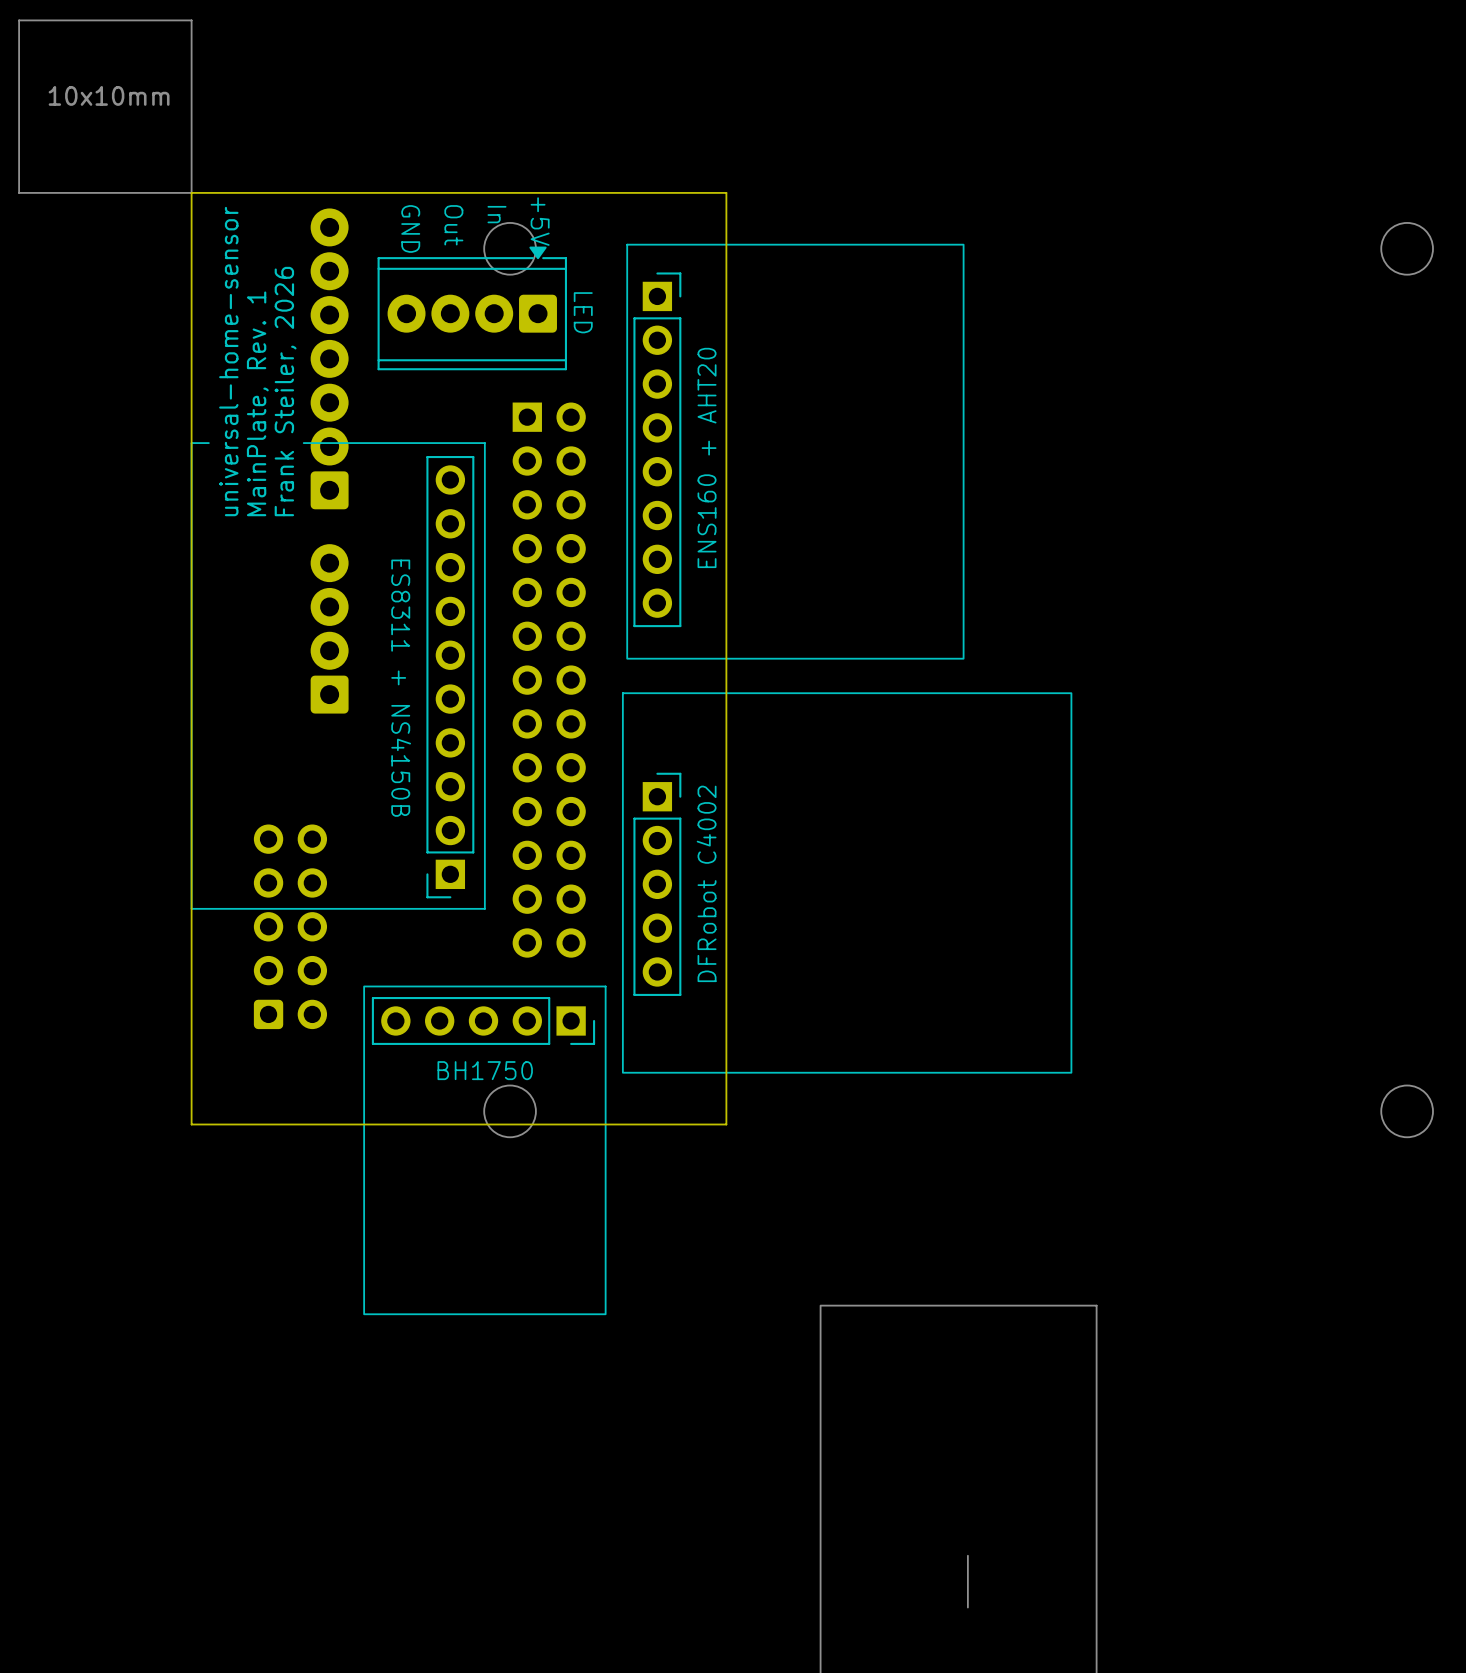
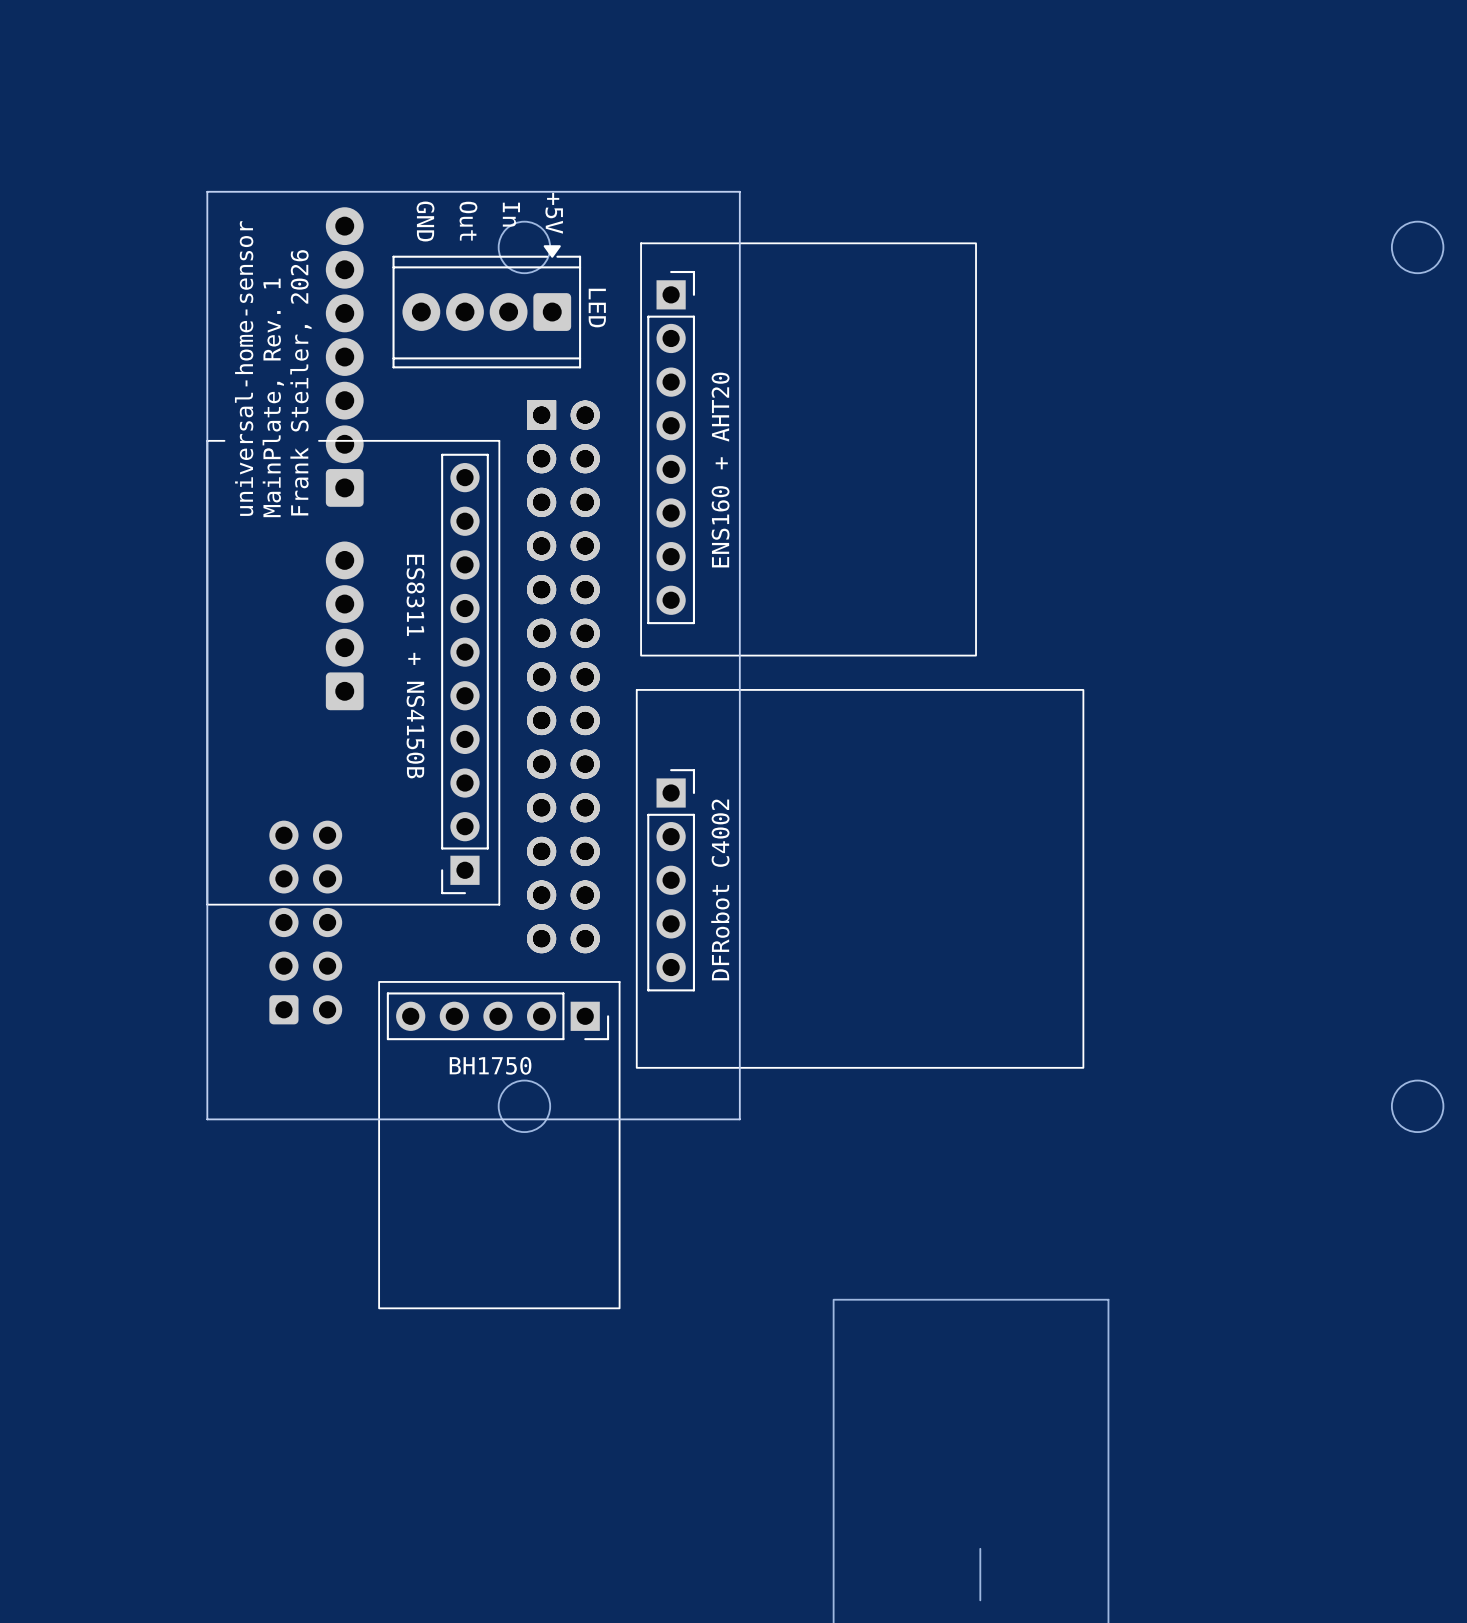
line: (19, 20) (191, 20) (191, 192) (19, 192) (19, 20) -> none
text: 10x10mm (109, 95) -> none
part: none -> (563, 676)

